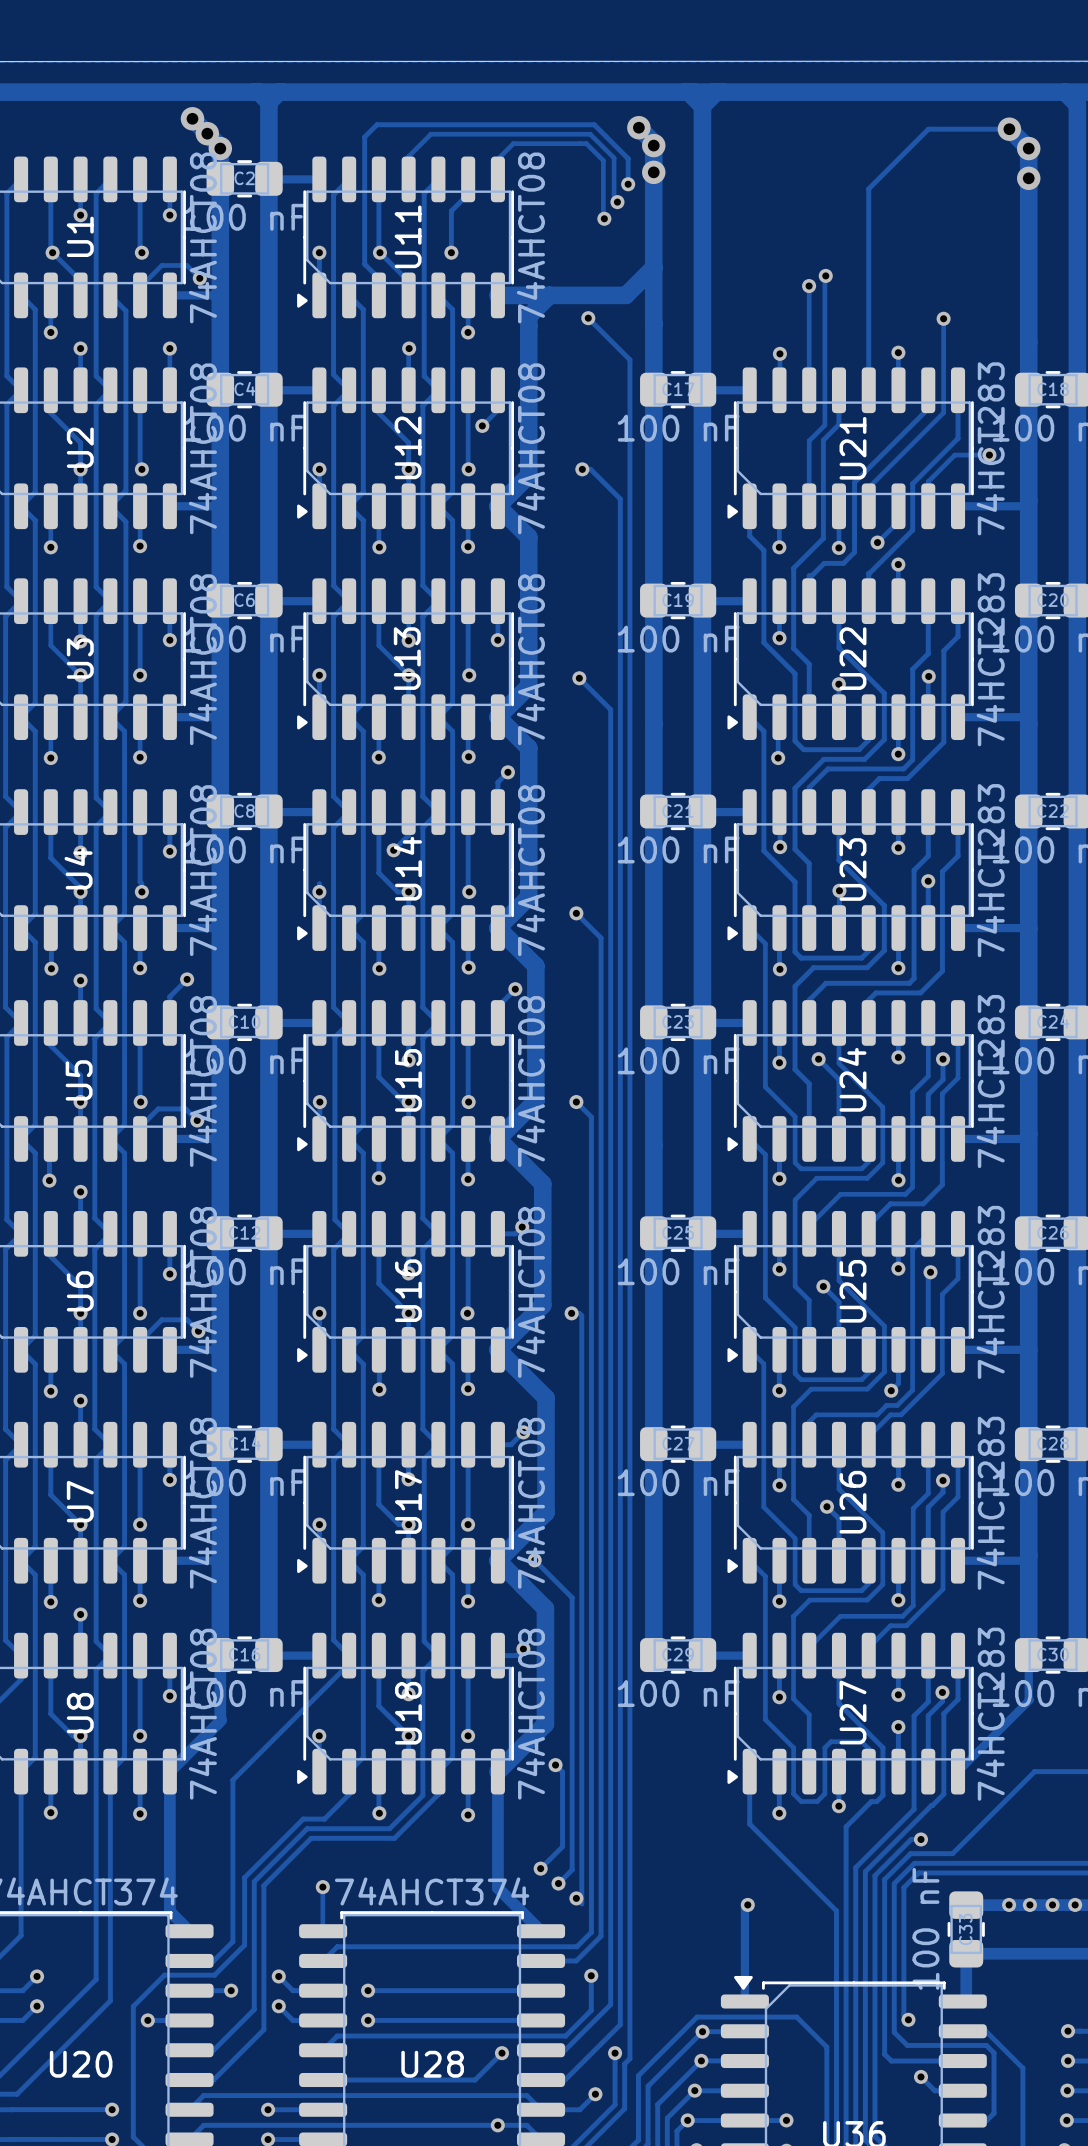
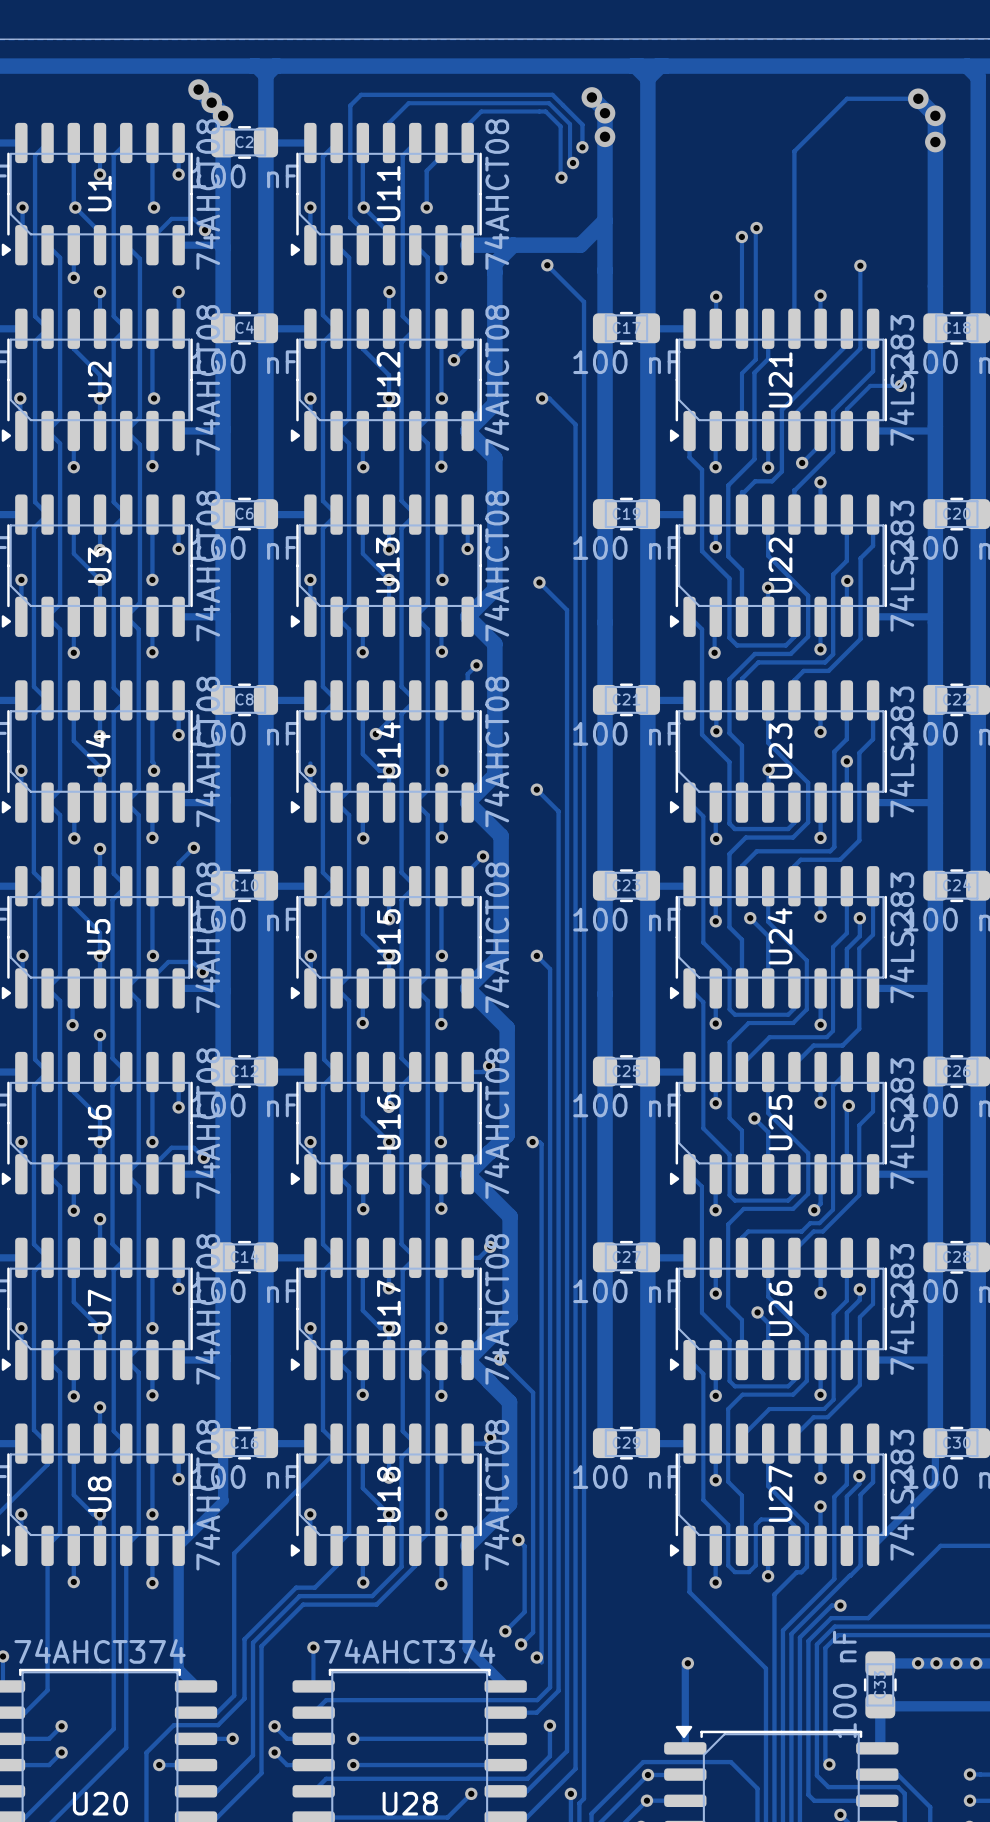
U21 value: 74HCT283 (990, 448) -> 74LS283 (901, 380)
U22 value: 74HCT283 (990, 659) -> 74LS283 (901, 566)
U23 value: 74HCT283 (990, 870) -> 74LS283 (901, 752)
U24 value: 74HCT283 (990, 1081) -> 74LS283 (901, 937)
U25 value: 74HCT283 (990, 1292) -> 74LS283 (901, 1123)
U26 value: 74HCT283 (990, 1503) -> 74LS283 (901, 1309)
U27 value: 74HCT283 (990, 1714) -> 74LS283 (901, 1495)

